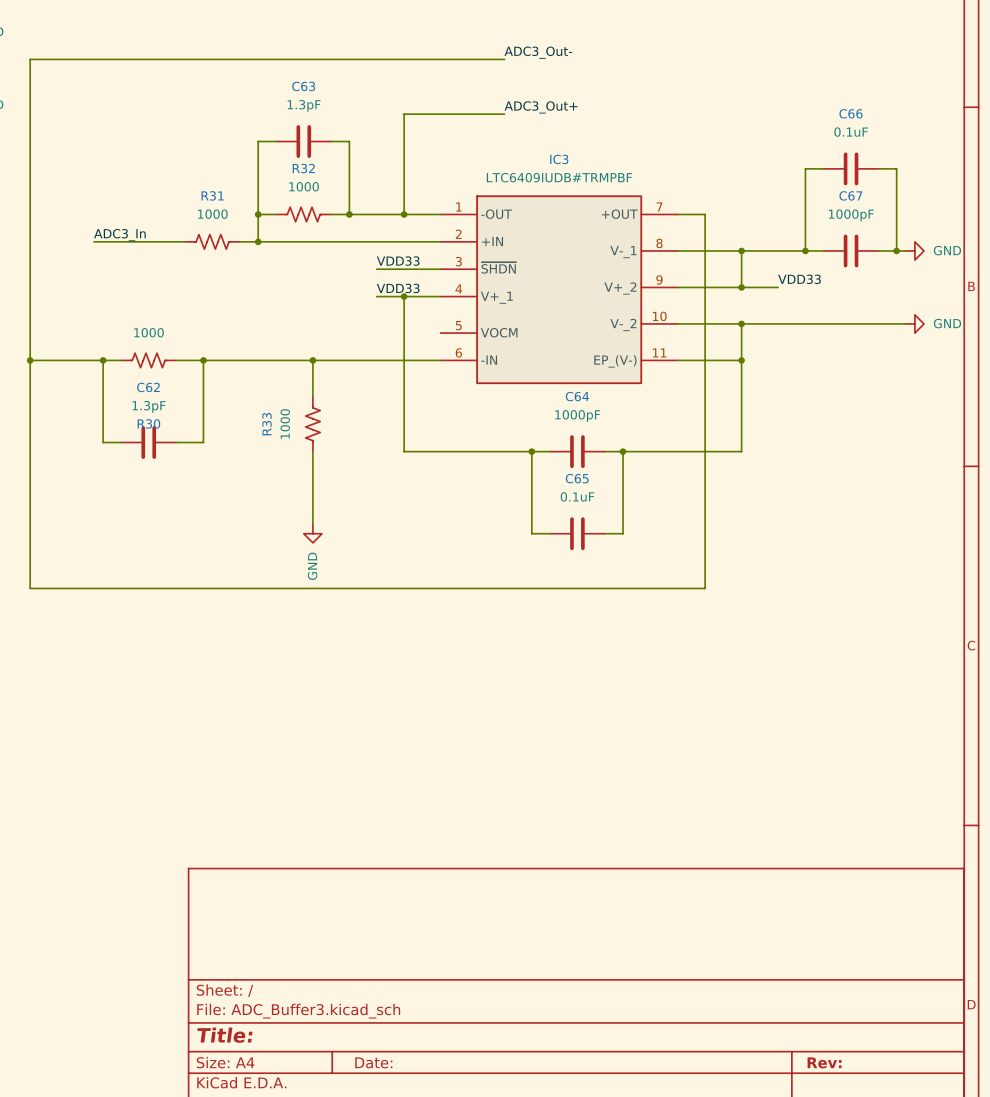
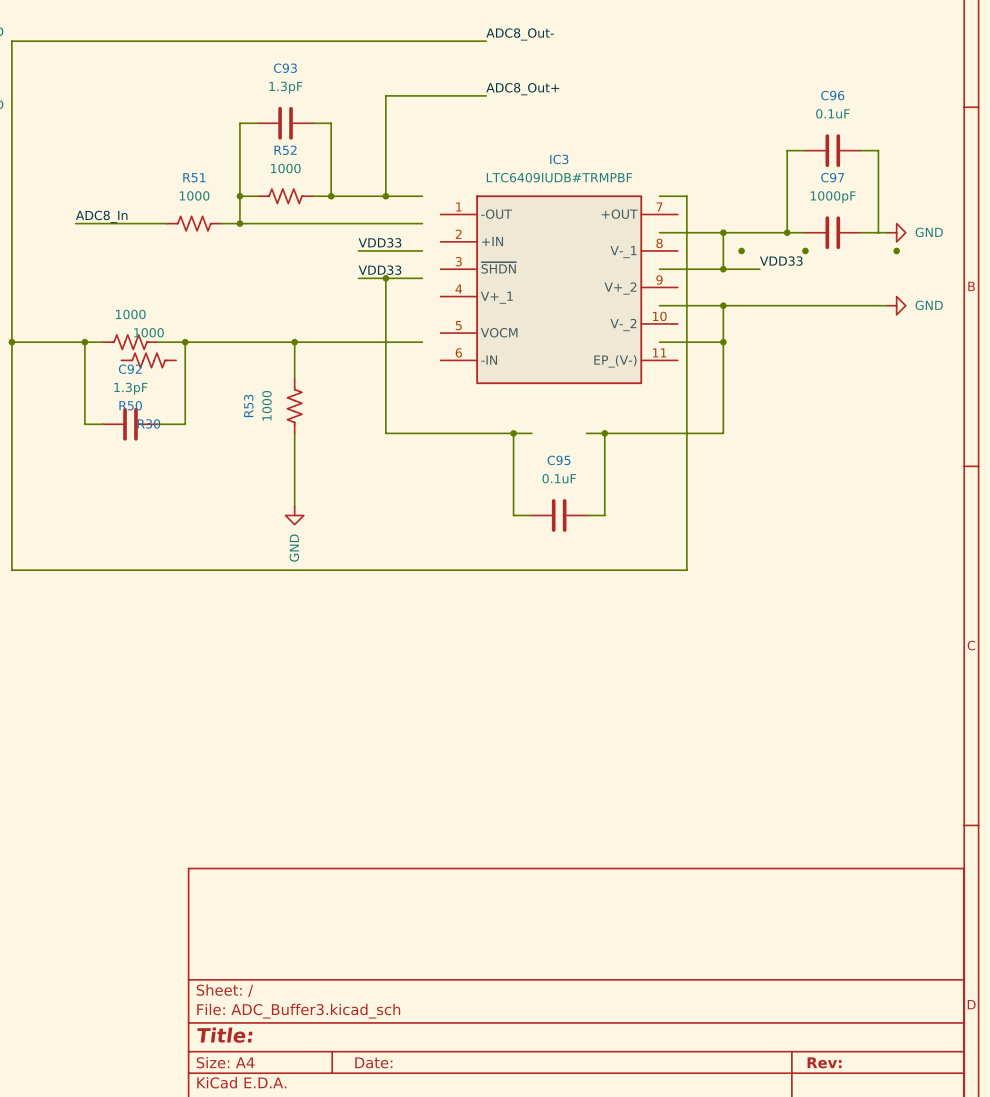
label: ADC3_Out- (538, 52) -> ADC8_Out- (520, 34)
wire: (504, 59) (30, 59) (30, 588) (705, 588) (705, 214) (677, 214) -> (486, 41) (11, 41) (11, 570) (686, 570) (686, 196) (659, 196)
label: ADC3_Out+ (540, 107) -> ADC8_Out+ (522, 89)
wire: (504, 114) (404, 114) (404, 214) -> (486, 95) (385, 95) (385, 196)
C93: none -> 1.3pF (285, 123)
wire: (276, 141) (258, 141) (258, 241) -> (258, 123) (239, 123) (239, 223)
C63: 1.3pF (303, 141) -> none
wire: (331, 141) (349, 141) (349, 214) -> (312, 123) (331, 123) (331, 196)
C96: none -> 0.1uF (832, 150)
wire: (823, 168) (805, 168) (805, 250) -> (805, 150) (787, 150) (787, 232)
C66: 0.1uF (851, 168) -> none
wire: (878, 168) (896, 168) (896, 250) -> (860, 150) (878, 150) (878, 232)
junction: none -> (239, 196)
R52: none -> 1000 (285, 196)
junction: none -> (331, 196)
junction: none -> (385, 196)
wire: (258, 214) (276, 214) -> (239, 196) (258, 196)
junction: (258, 214) -> none
R32: 1000 (303, 214) -> none
wire: (331, 214) (440, 214) -> (312, 196) (422, 196)
junction: (349, 214) -> none
junction: (404, 214) -> none
R51: none -> 1000 (194, 223)
junction: none -> (239, 223)
junction: none -> (723, 232)
junction: none -> (787, 232)
C97: none -> 1000pF (832, 232)
label: ADC3_In (119, 235) -> ADC8_In (101, 216)
wire: (94, 241) (185, 241) -> (75, 223) (166, 223)
R31: 1000 (212, 241) -> none
wire: (239, 241) (440, 241) -> (221, 223) (422, 223)
junction: (258, 241) -> none
label: none -> VDD33 (379, 242)
wire: (677, 250) (823, 250) -> (659, 232) (805, 232)
wire: (741, 250) (741, 287) -> (723, 232) (723, 269)
C67: 1000pF (851, 250) -> none
wire: (878, 250) (905, 250) -> (860, 232) (887, 232)
power symbol position: GND (914, 250) -> GND (896, 232)
label: VDD33 (398, 261) -> none
wire: (376, 269) (440, 269) -> (358, 250) (422, 250)
junction: none -> (723, 269)
label: none -> VDD33 (379, 270)
label position: VDD33 (799, 279) -> VDD33 (781, 261)
wire: (677, 287) (778, 287) -> (659, 269) (759, 269)
junction: (741, 287) -> none
label: VDD33 (398, 288) -> none
wire: (376, 296) (440, 296) -> (358, 278) (422, 278)
wire: (404, 296) (404, 451) (550, 451) -> (385, 278) (385, 433) (531, 433)
junction position: (404, 296) -> (385, 278)
junction: none -> (723, 305)
wire: (677, 323) (905, 323) -> (659, 305) (887, 305)
wire: (741, 323) (741, 451) (604, 451) -> (723, 305) (723, 433) (586, 433)
junction: (741, 323) -> none
power symbol position: GND (914, 323) -> GND (896, 305)
R50: none -> 1000 (130, 342)
junction: none -> (723, 342)
wire: (30, 360) (121, 360) -> (11, 342) (103, 342)
junction position: (30, 360) -> (11, 342)
wire: (103, 360) (103, 442) (121, 442) -> (84, 342) (84, 424) (103, 424)
junction position: (103, 360) -> (84, 342)
wire: (176, 360) (440, 360) -> (157, 342) (422, 342)
wire: (203, 360) (203, 442) (176, 442) -> (185, 342) (185, 424) (157, 424)
junction position: (203, 360) -> (185, 342)
wire: (312, 360) (312, 396) -> (294, 342) (294, 378)
junction position: (312, 360) -> (294, 342)
wire: (677, 360) (741, 360) -> (659, 342) (723, 342)
junction: (741, 360) -> none
R53: none -> 1000 (294, 406)
C92: none -> 1.3pF (130, 424)
R33: 1000 (312, 424) -> none
C62: 1.3pF (148, 442) -> none
wire: (312, 451) (312, 524) -> (294, 433) (294, 506)
wire: (531, 451) (531, 533) (550, 533) -> (513, 433) (513, 515) (531, 515)
junction position: (531, 451) -> (513, 433)
C64: 1000pF (577, 451) -> none
wire: (623, 451) (623, 533) (604, 533) -> (604, 433) (604, 515) (586, 515)
junction position: (623, 451) -> (604, 433)
C95: none -> 0.1uF (559, 515)
power symbol position: GND (312, 533) -> GND (294, 515)
C65: 0.1uF (577, 533) -> none

